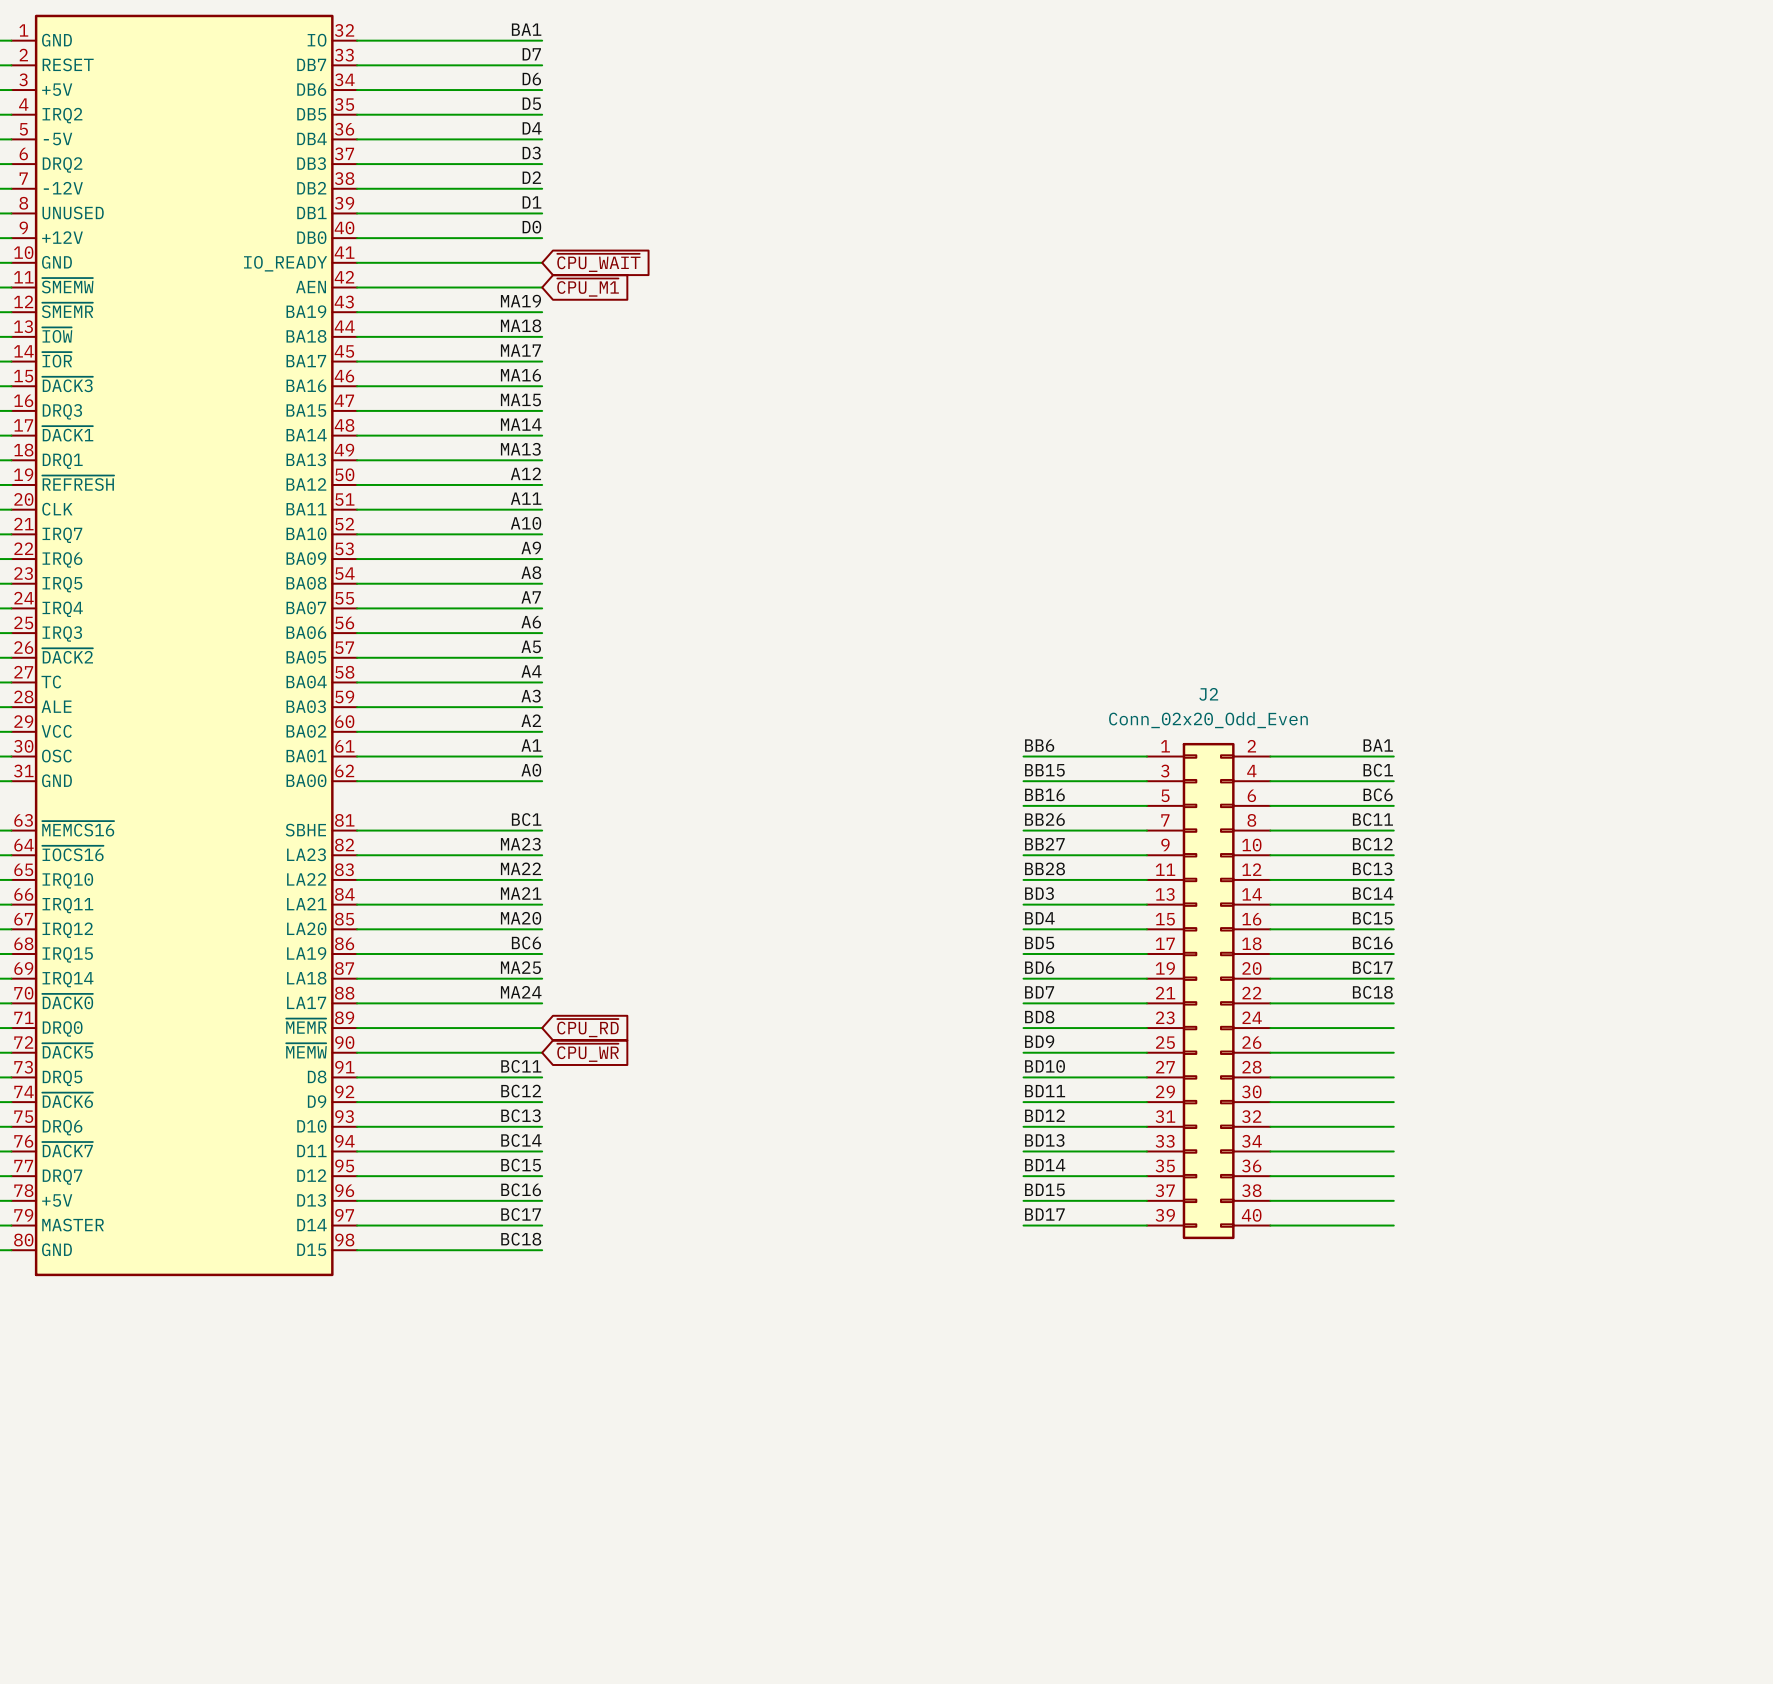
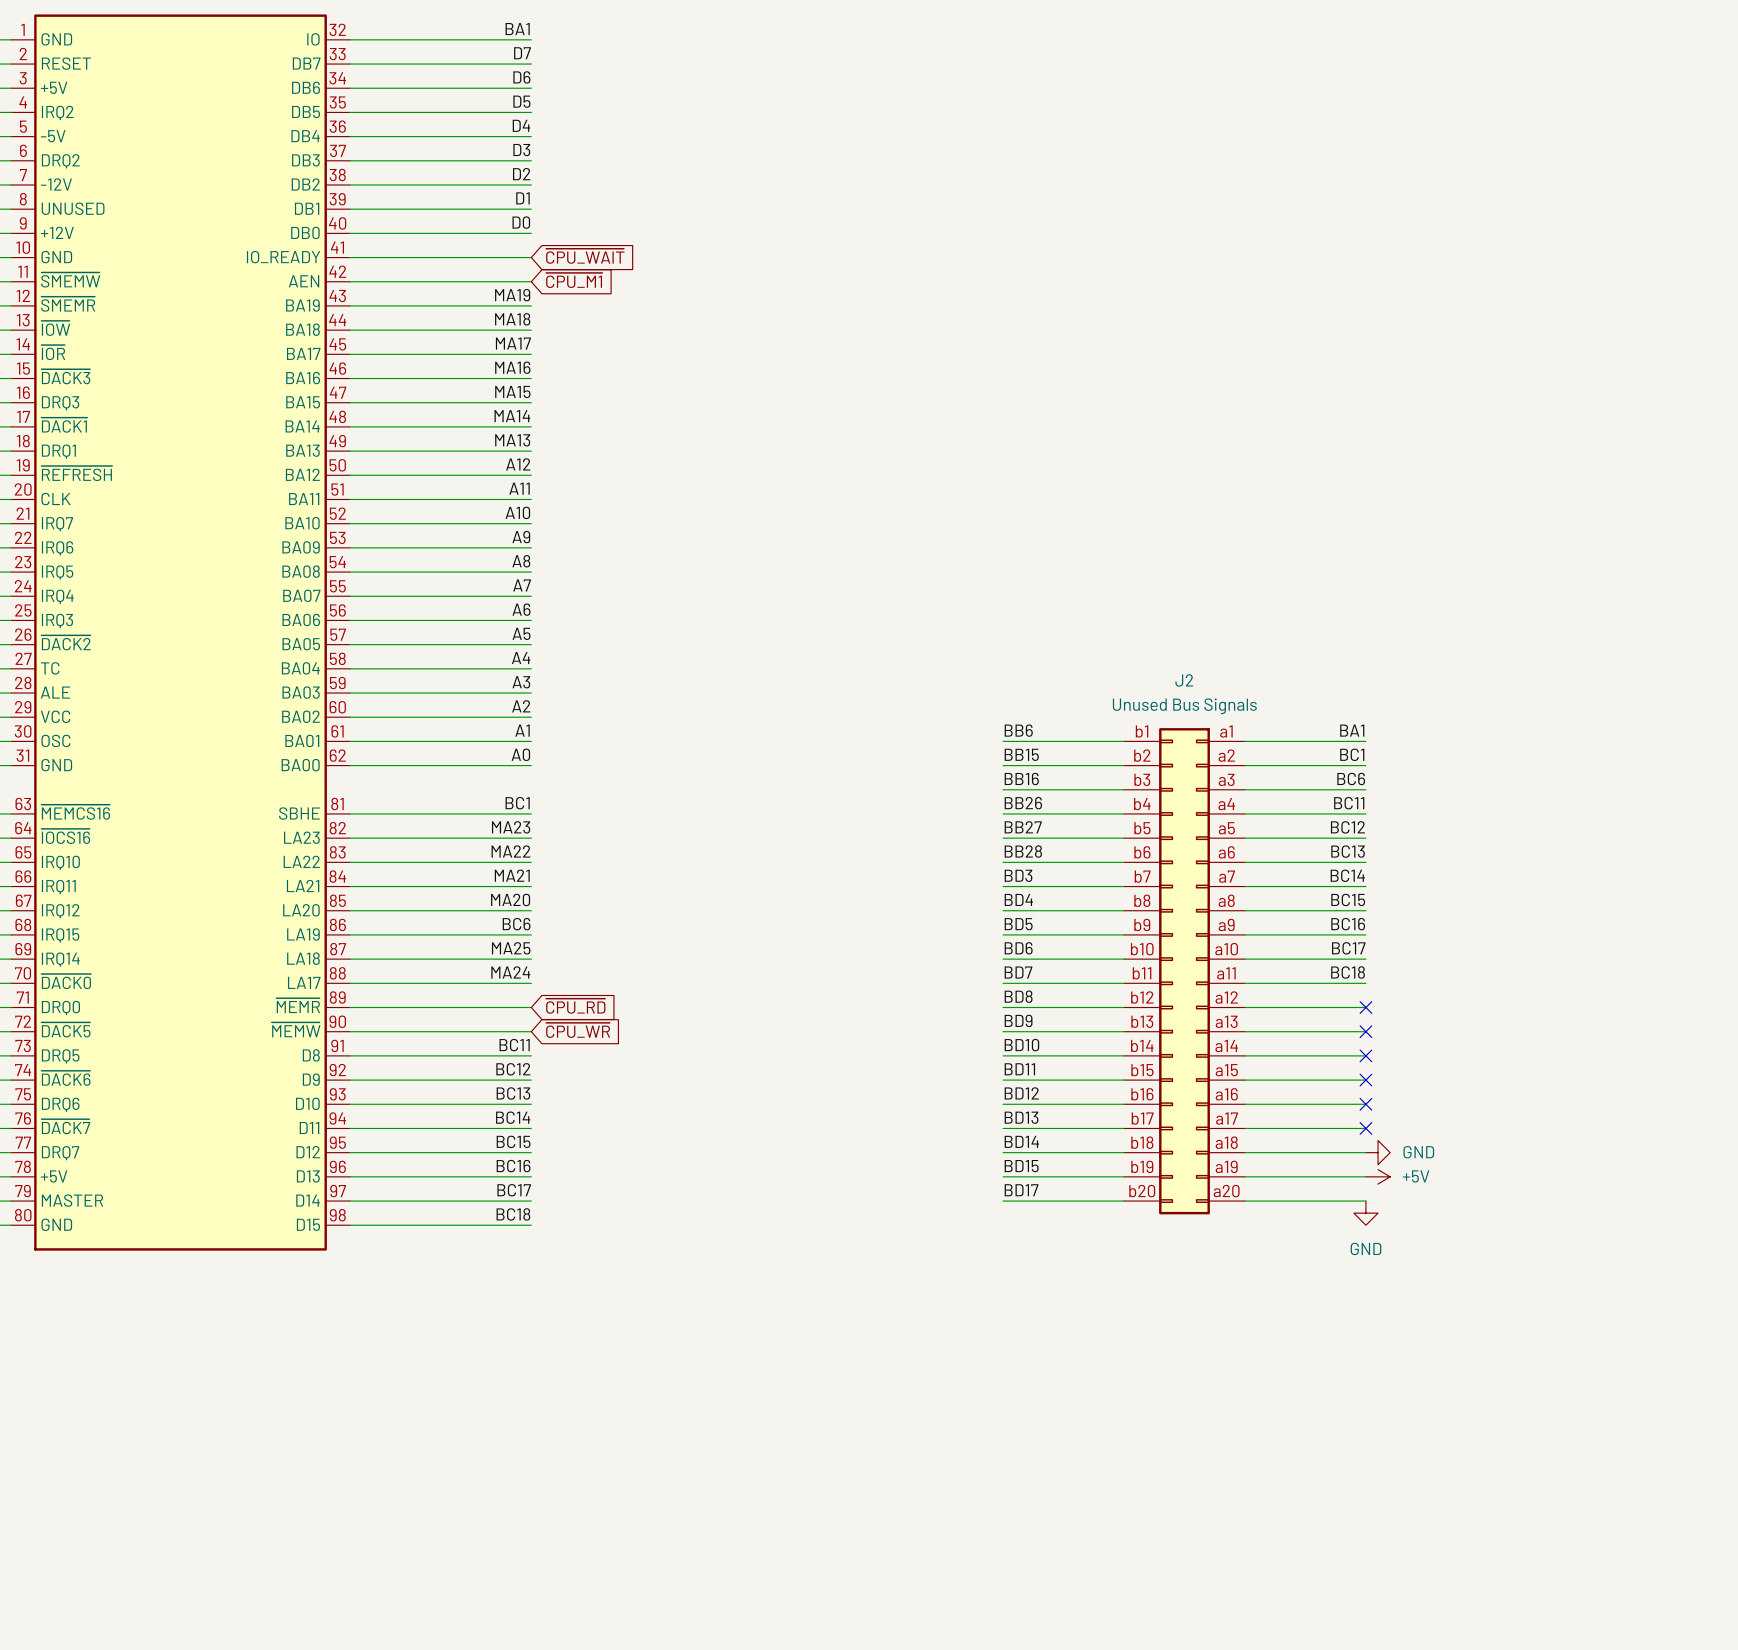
J2 value: Conn_02x20_Odd_Even (1208, 720) -> Unused Bus Signals (1184, 706)
J2 symbol: [1146, 742, 1271, 1240] -> [1124, 728, 1245, 1215]
no-connect mark: none -> (1365, 1007)
no-connect mark: none -> (1365, 1031)
no-connect mark: none -> (1365, 1055)
no-connect mark: none -> (1365, 1080)
no-connect mark: none -> (1365, 1104)
no-connect mark: none -> (1365, 1128)
power symbol: none -> GND (1378, 1152)
power symbol: none -> +5V (1378, 1176)
power symbol: none -> GND (1365, 1213)

